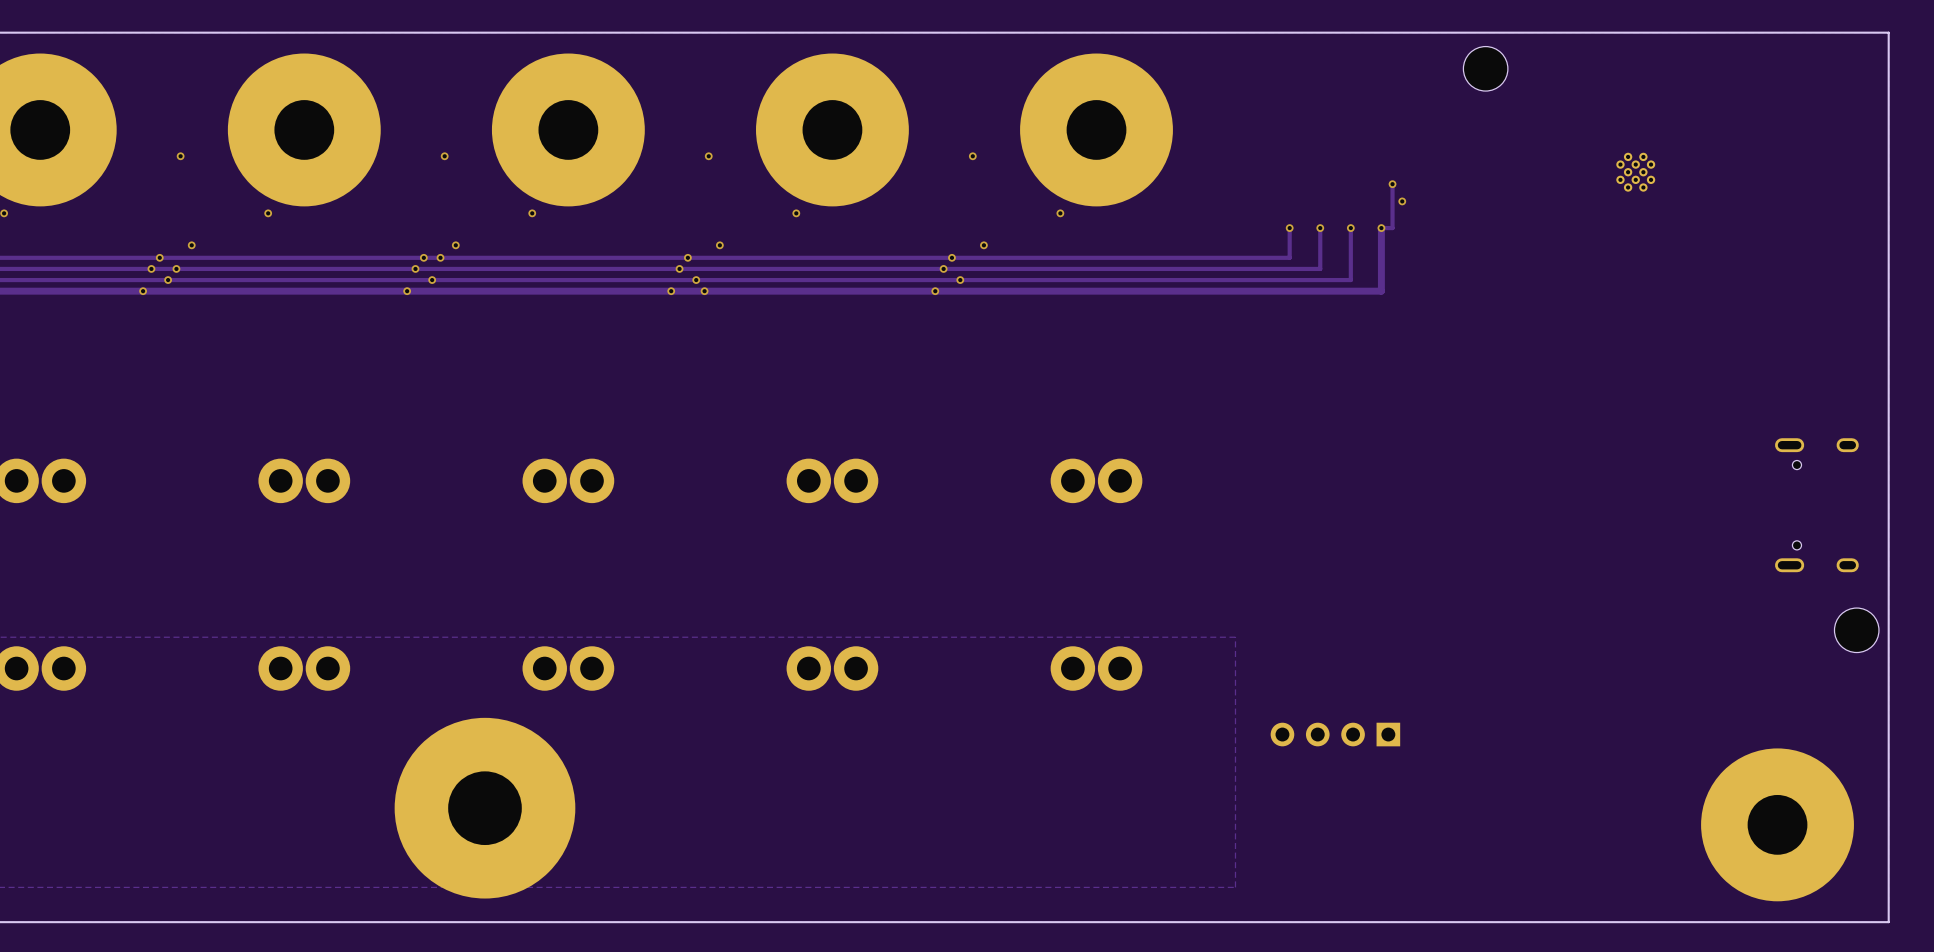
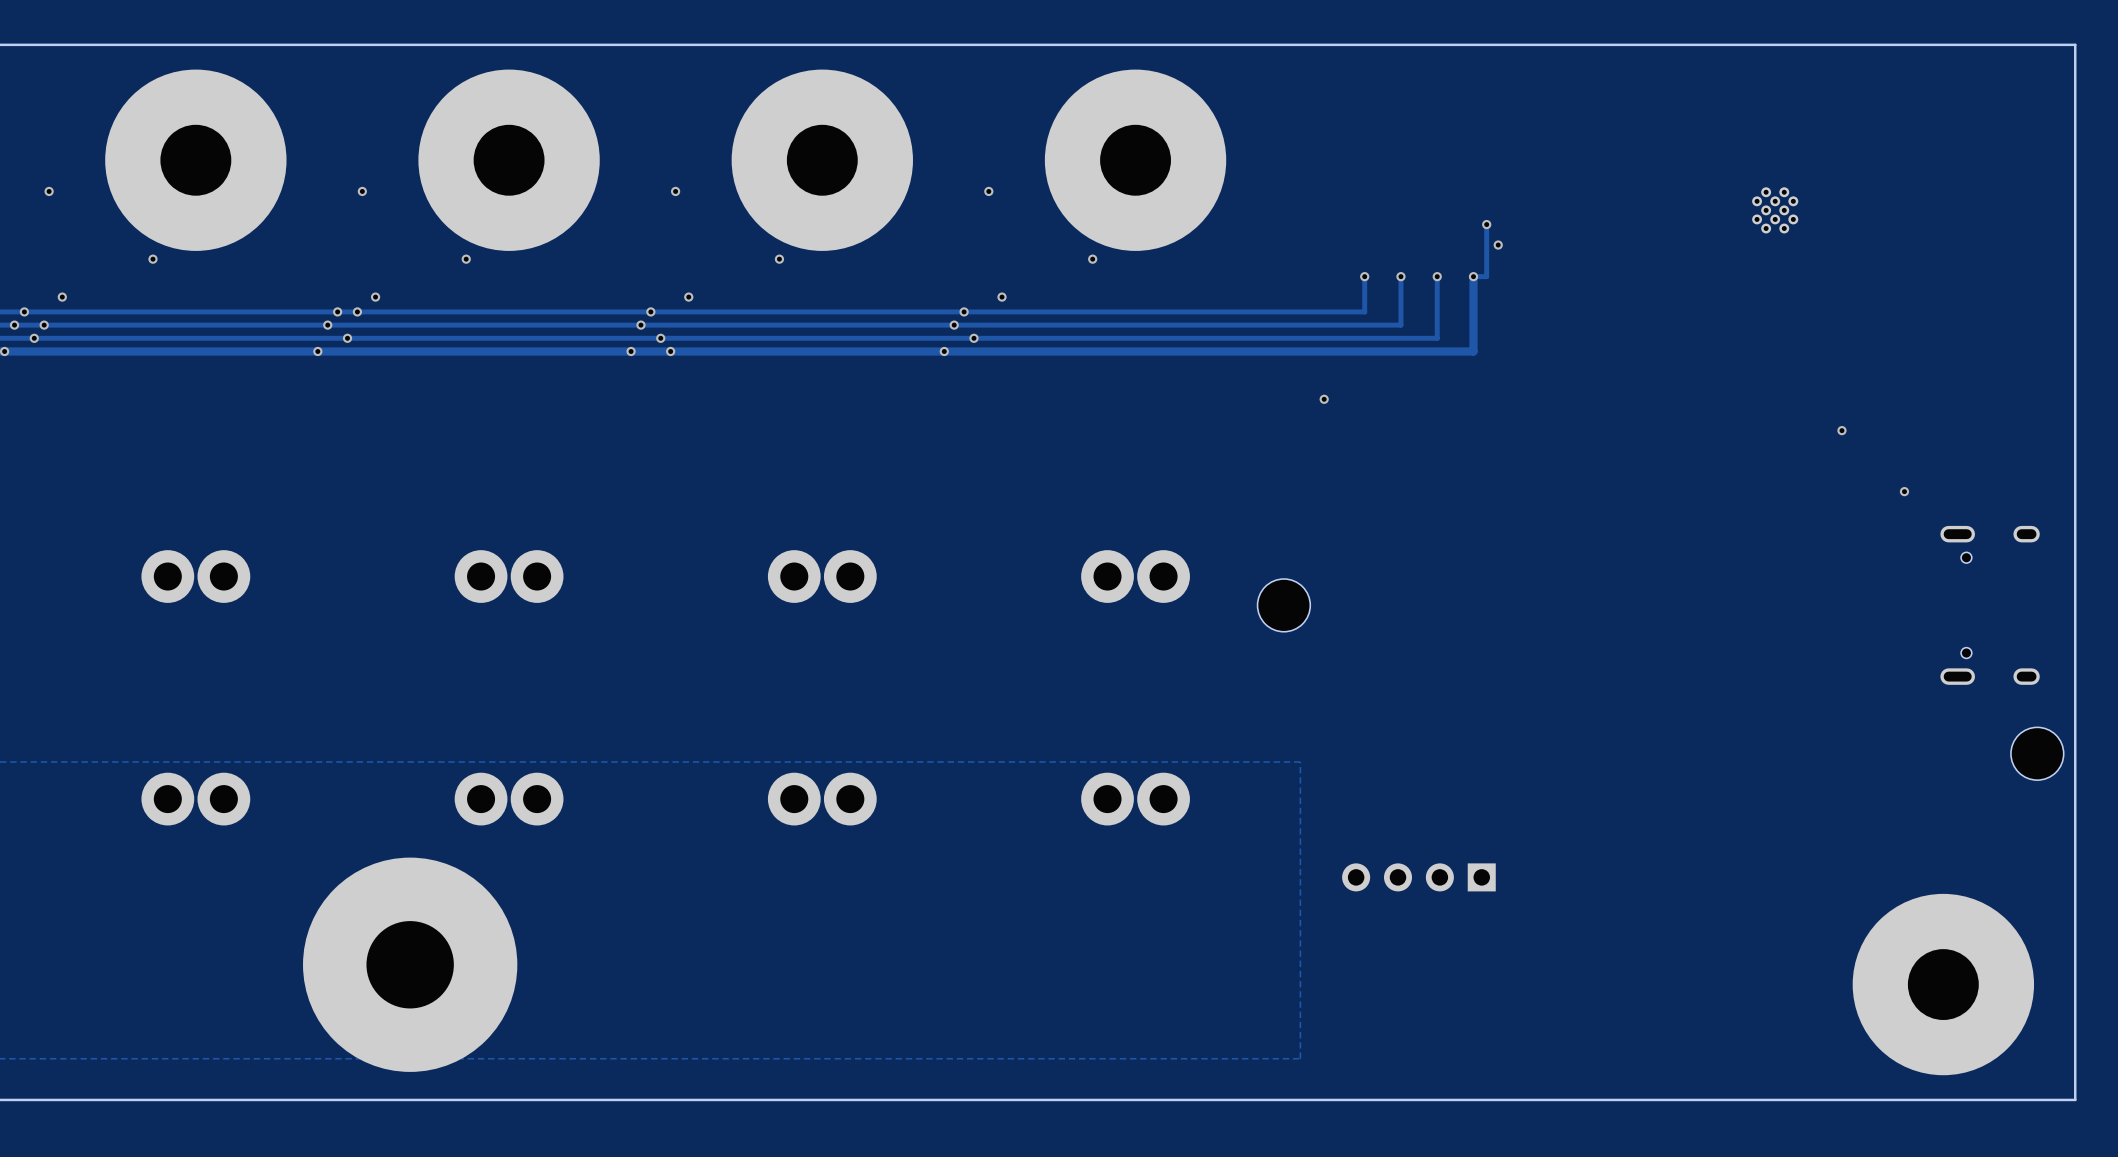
part: (1485, 68) -> none
via: none -> (1324, 399)
via: none -> (1841, 430)
via: none -> (1904, 491)
part: none -> (1283, 605)

